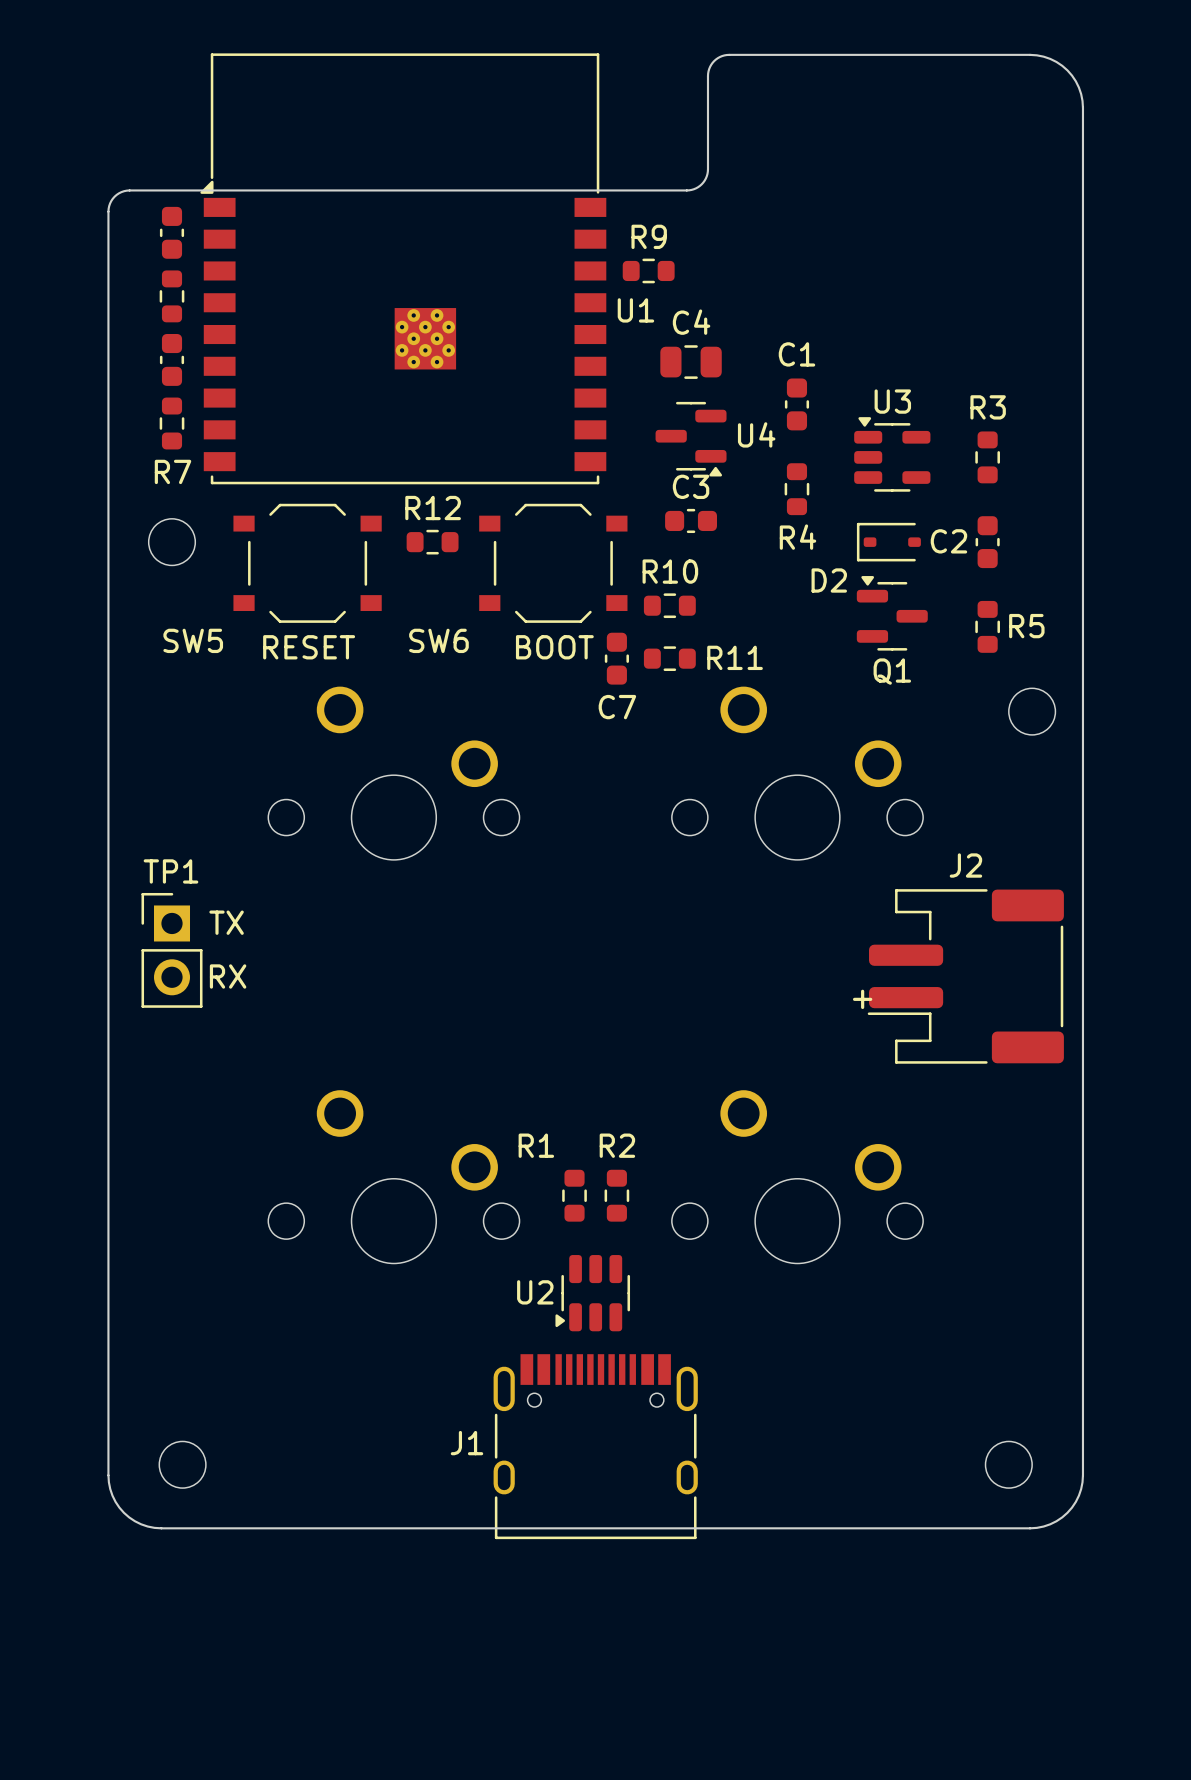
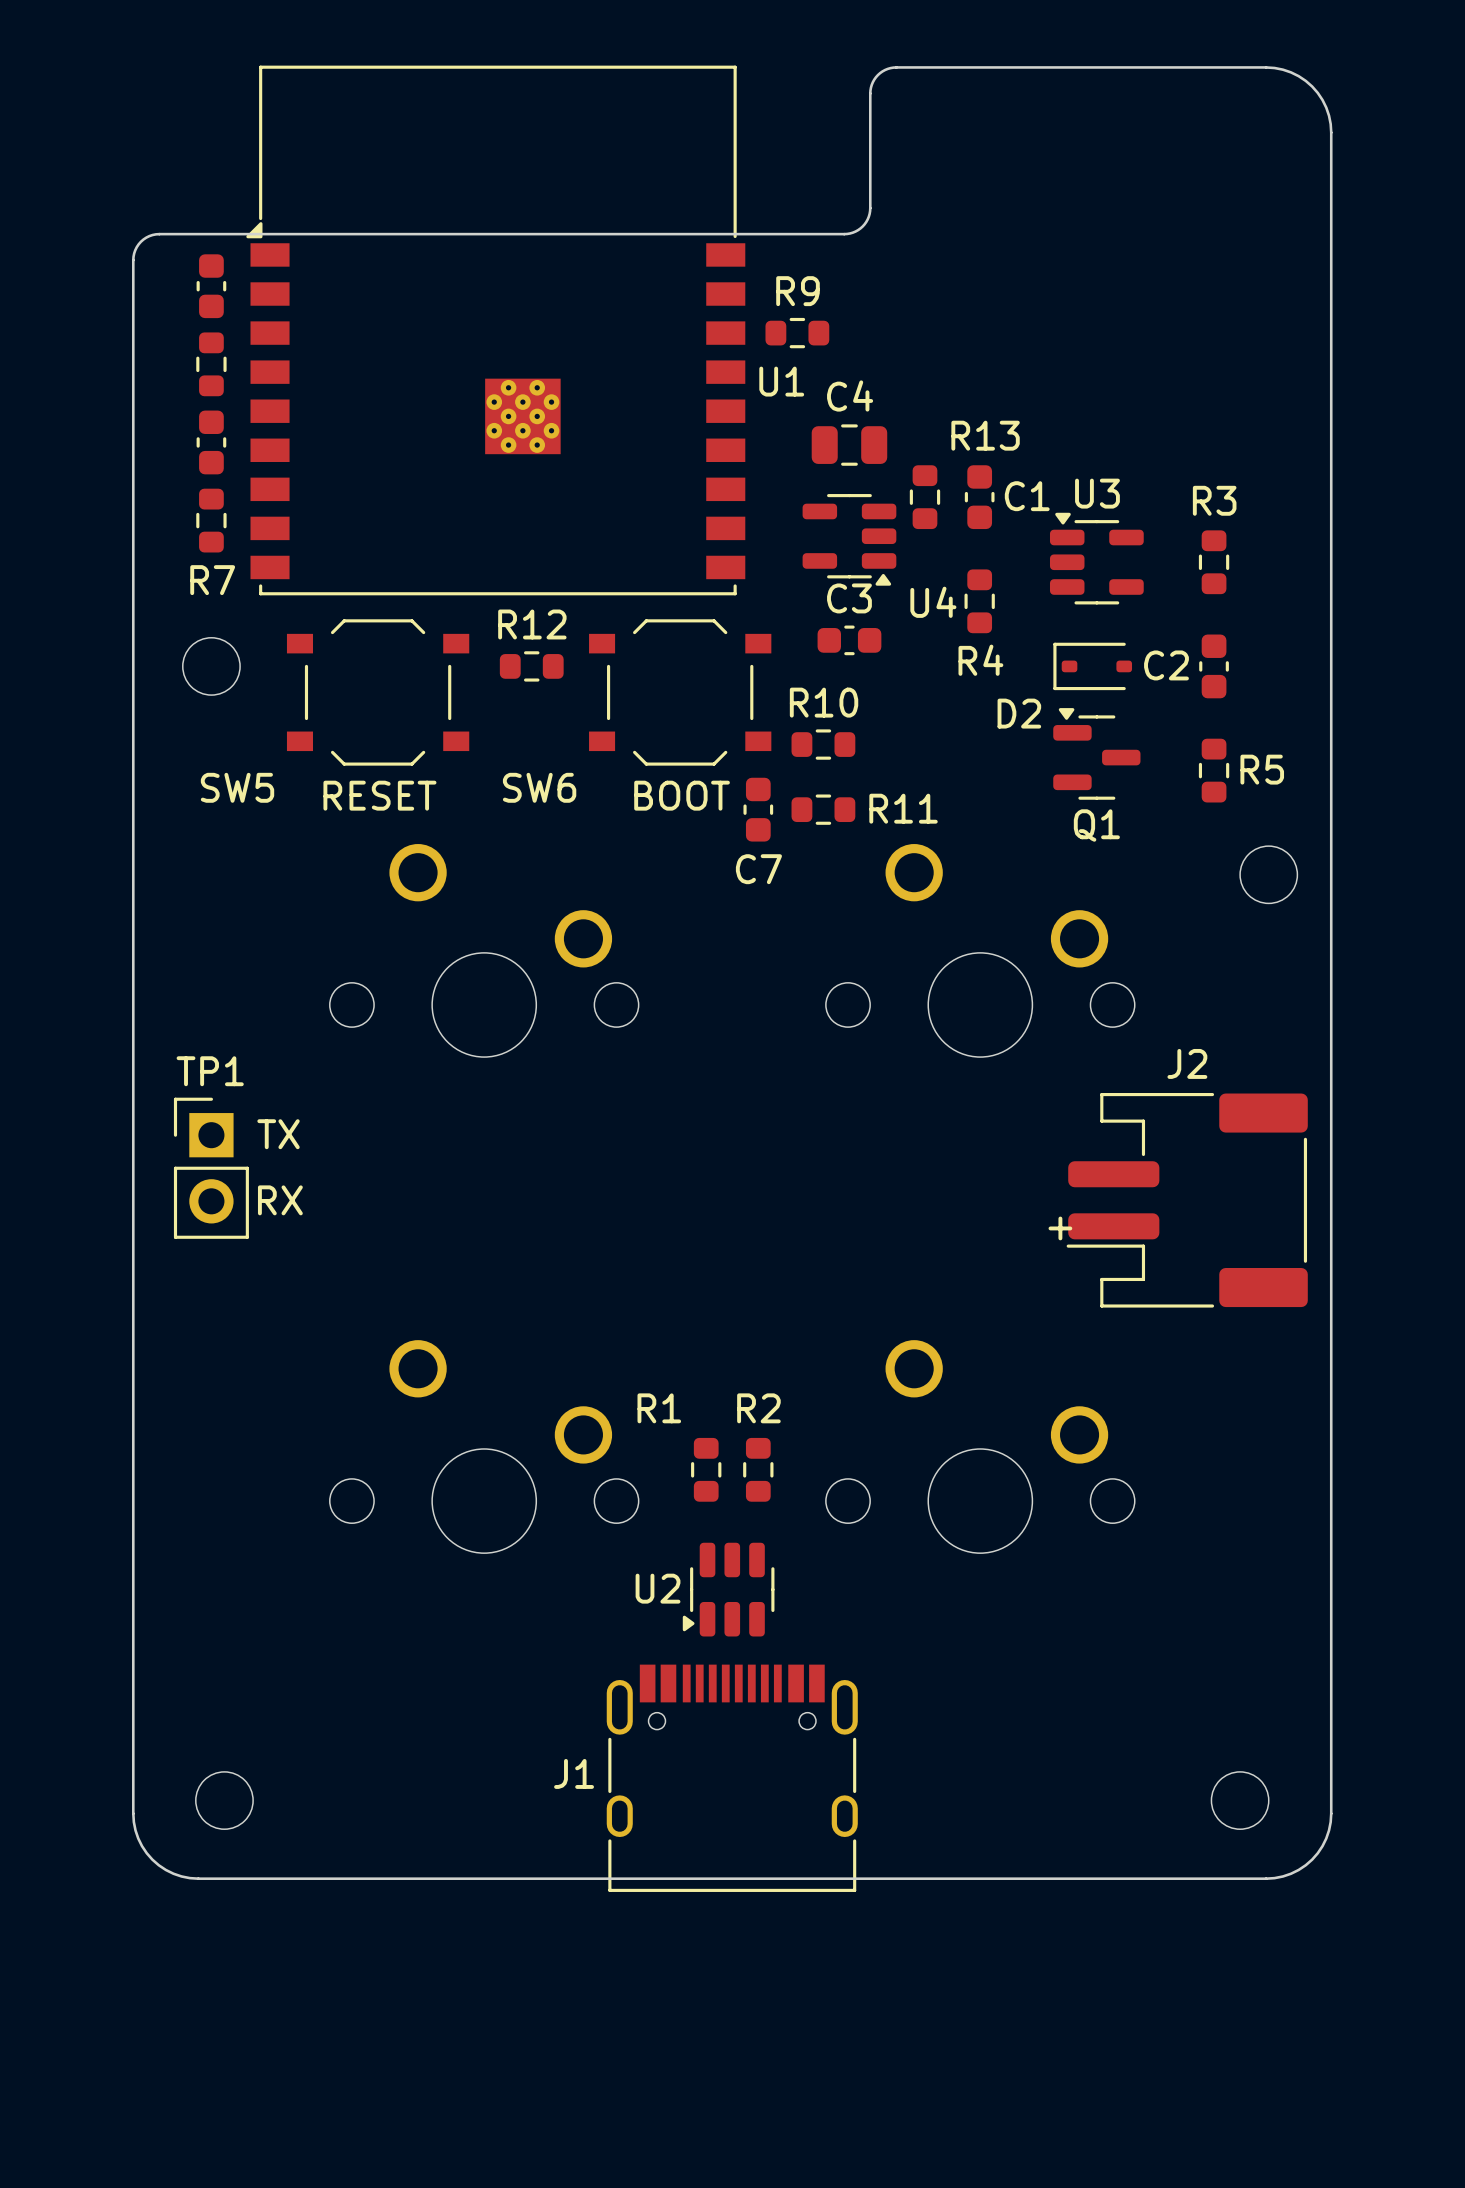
C1 name position: C1 (796, 354) -> C1 (1027, 496)
U4 footprint: [655, 401, 727, 477] -> [802, 494, 897, 586]
R13: none -> (924, 497)
U4 name position: U4 (756, 434) -> U4 (933, 602)

